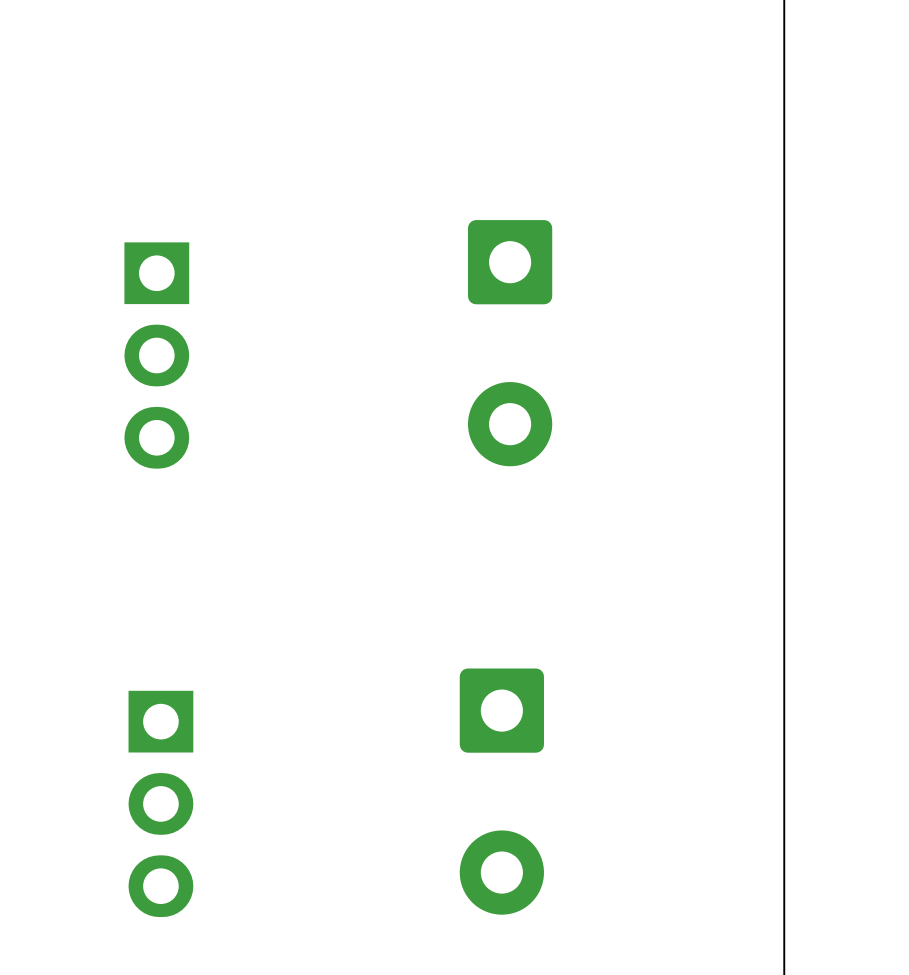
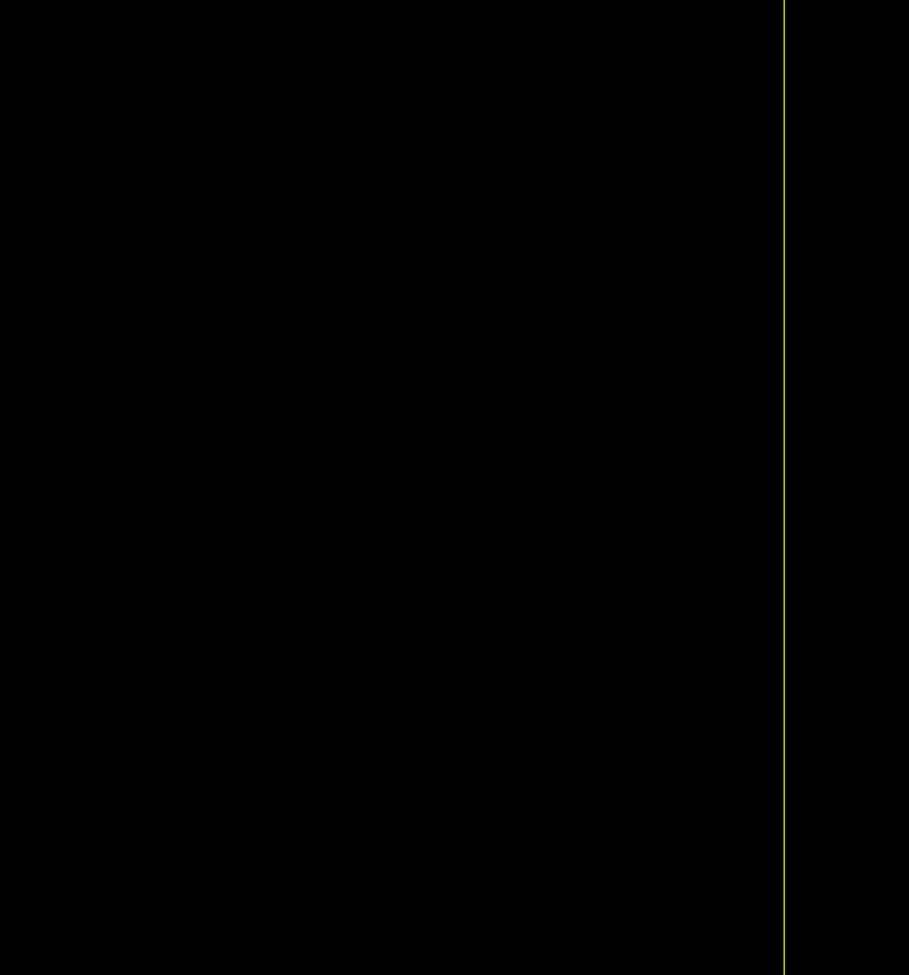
part: (510, 343) -> none
part: (156, 355) -> none
part: (501, 791) -> none
part: (160, 803) -> none

